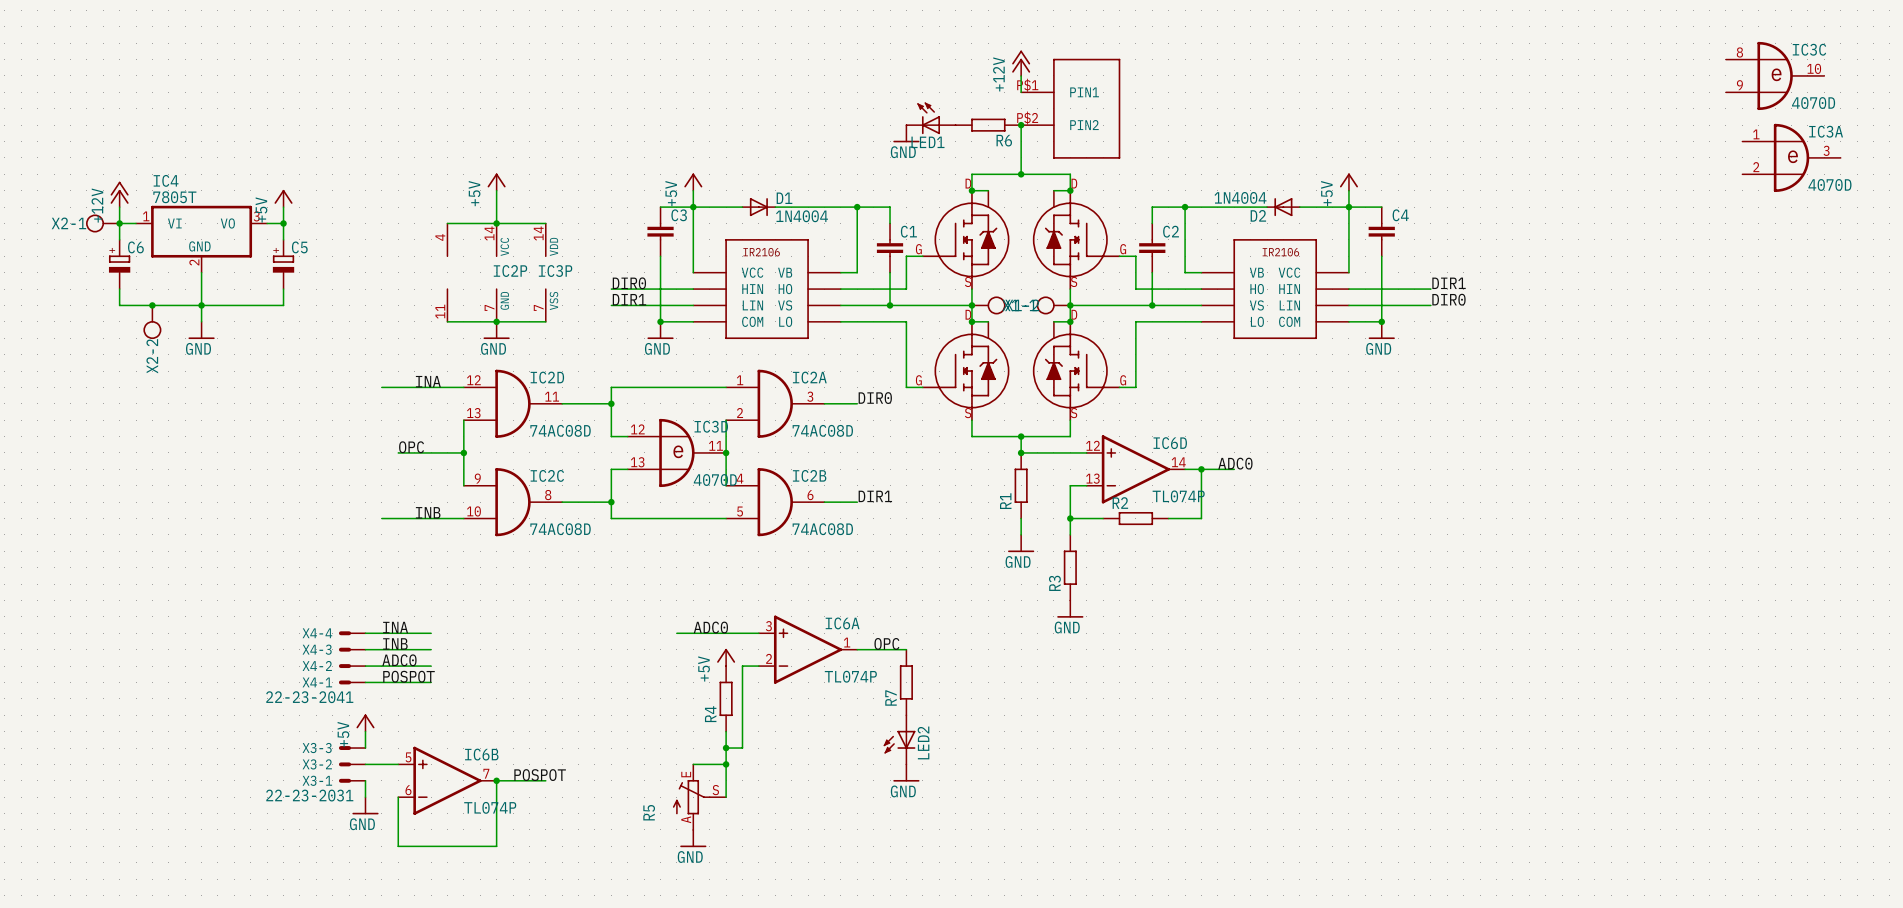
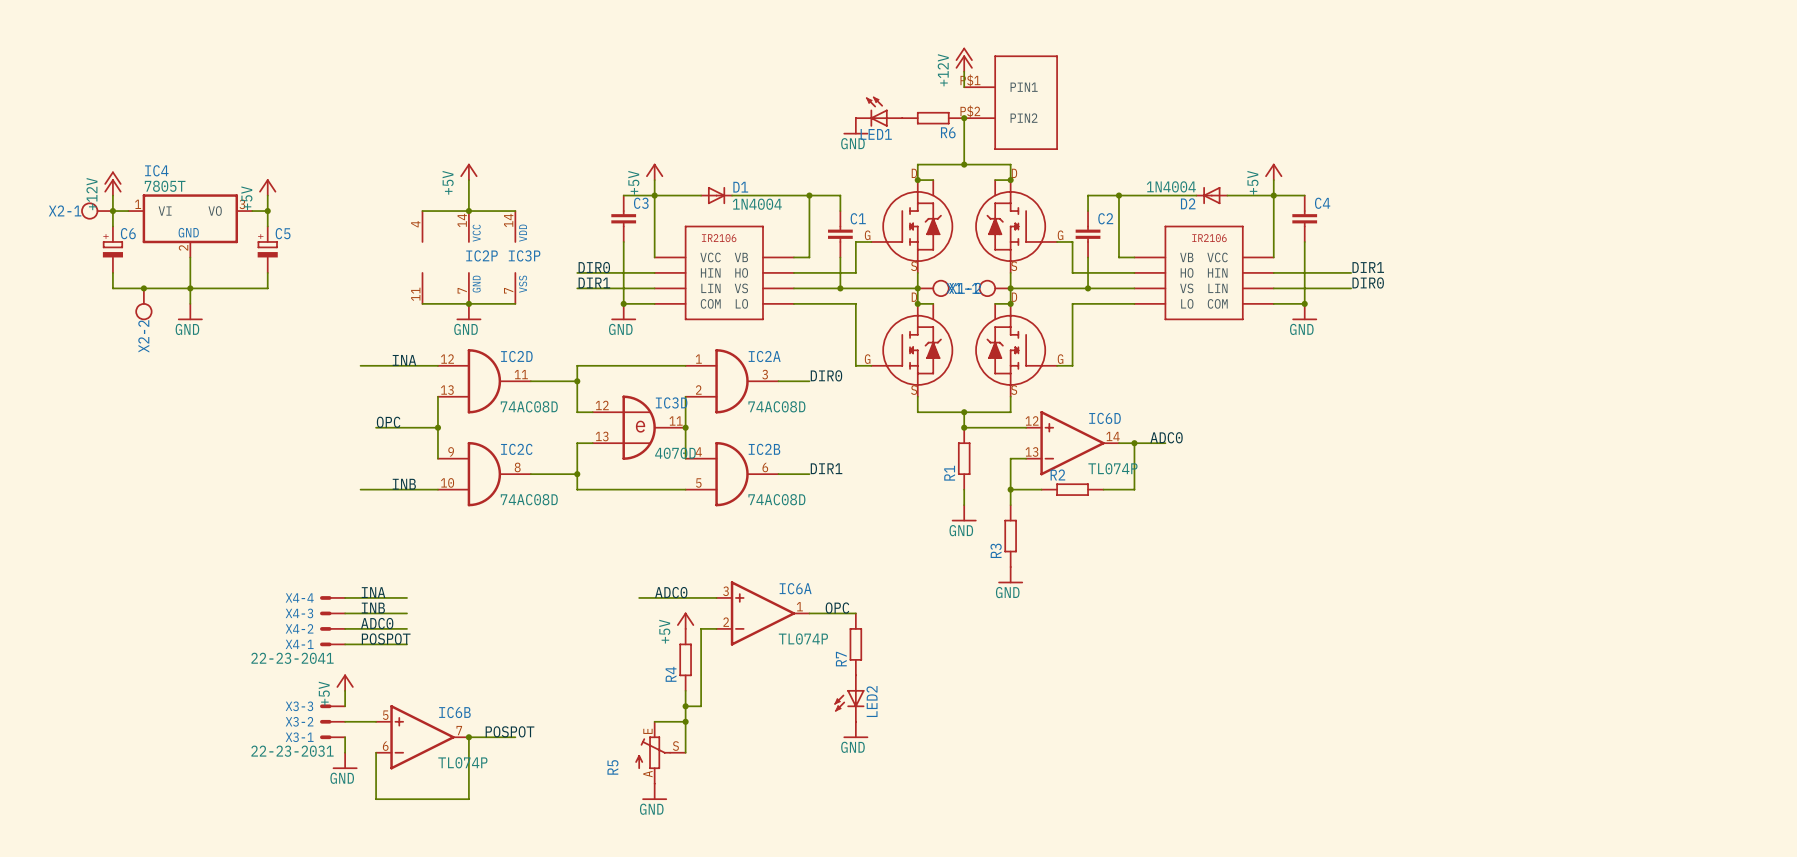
IC3C: 4070D (1775, 75) -> none
IC3A: 4070D (1791, 157) -> none

